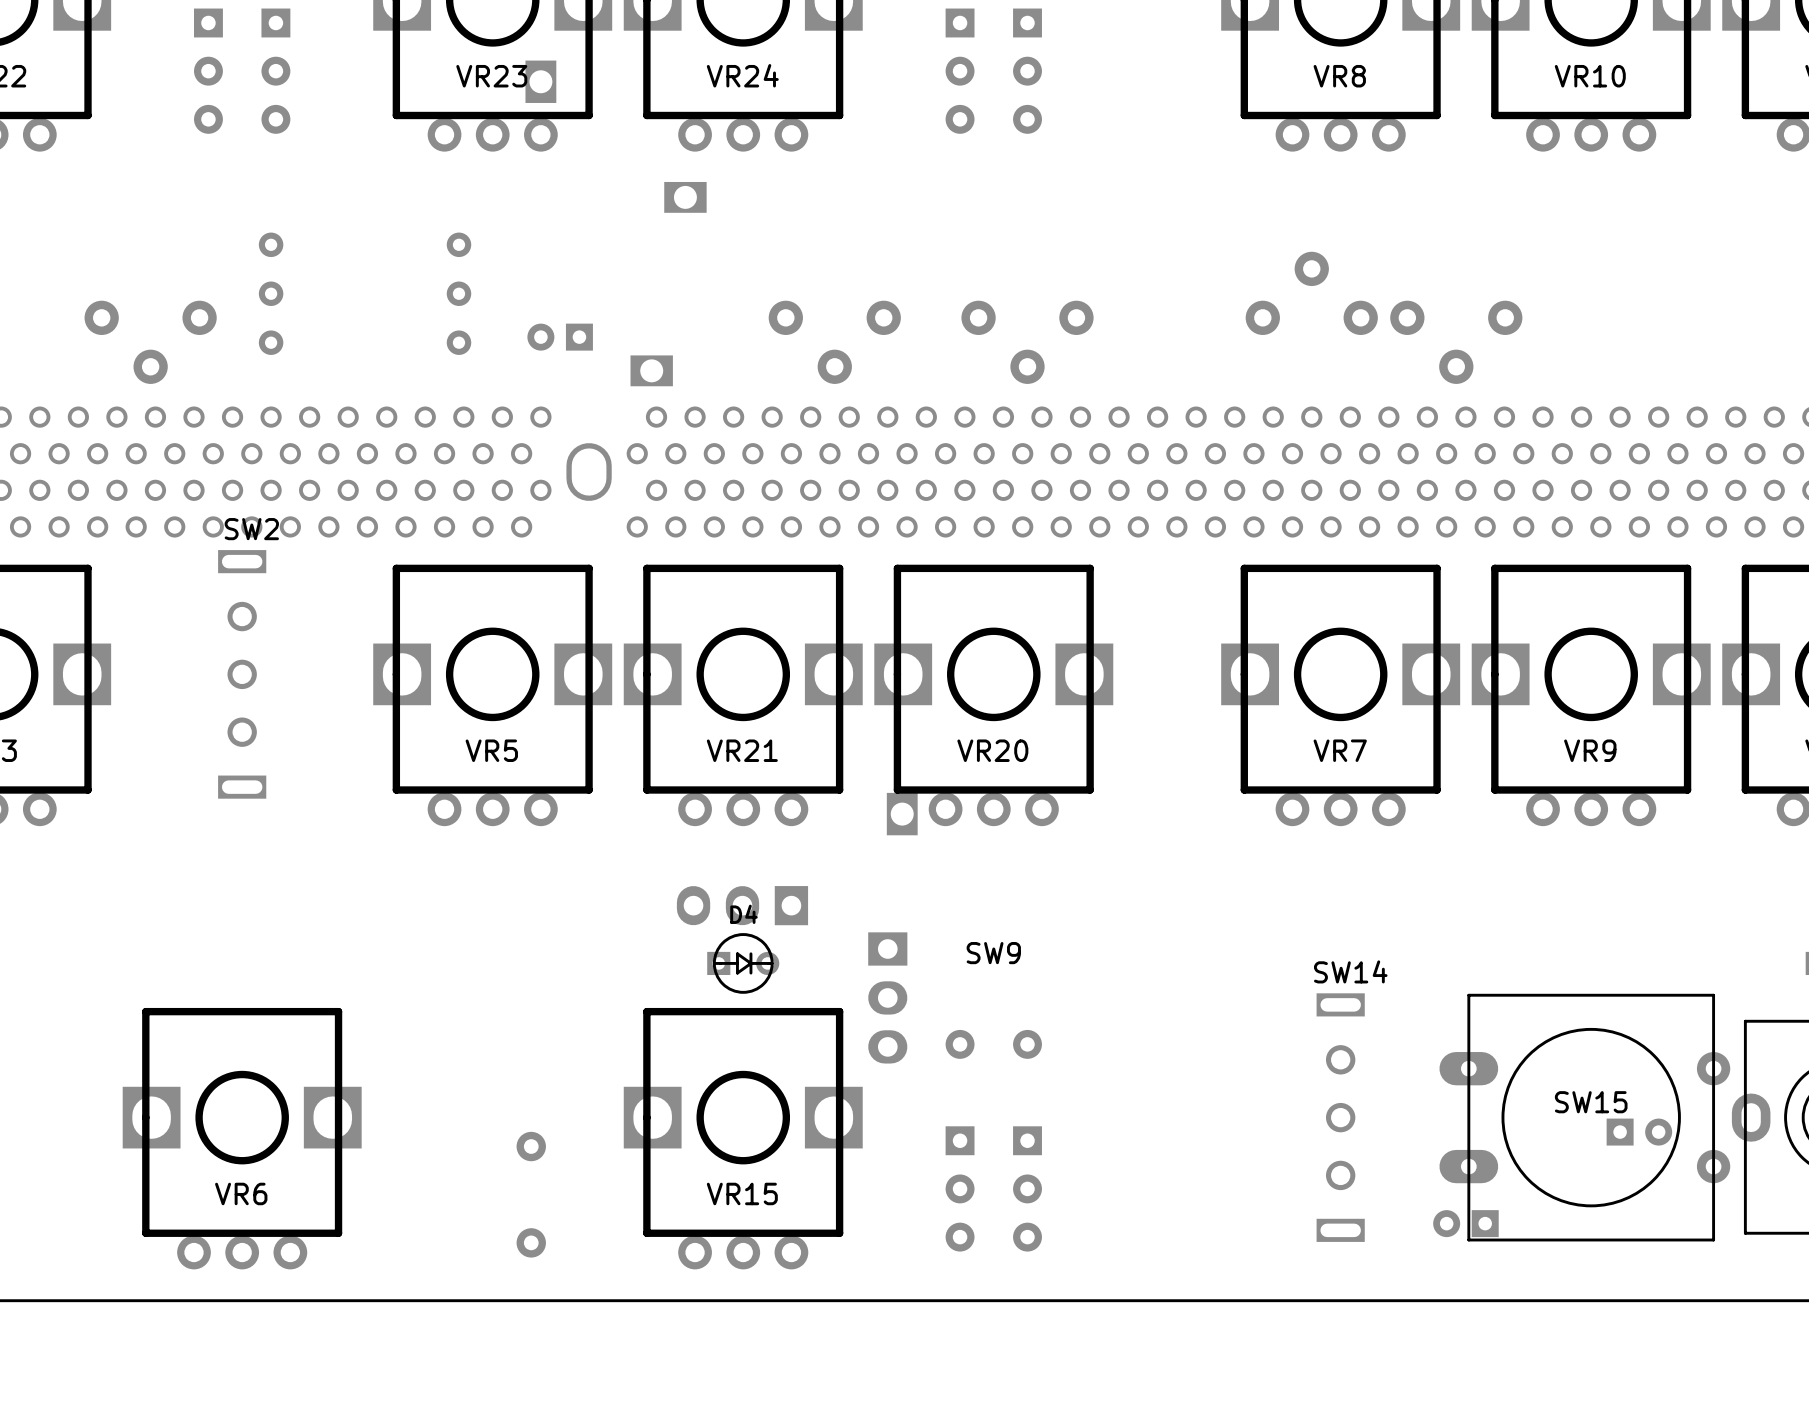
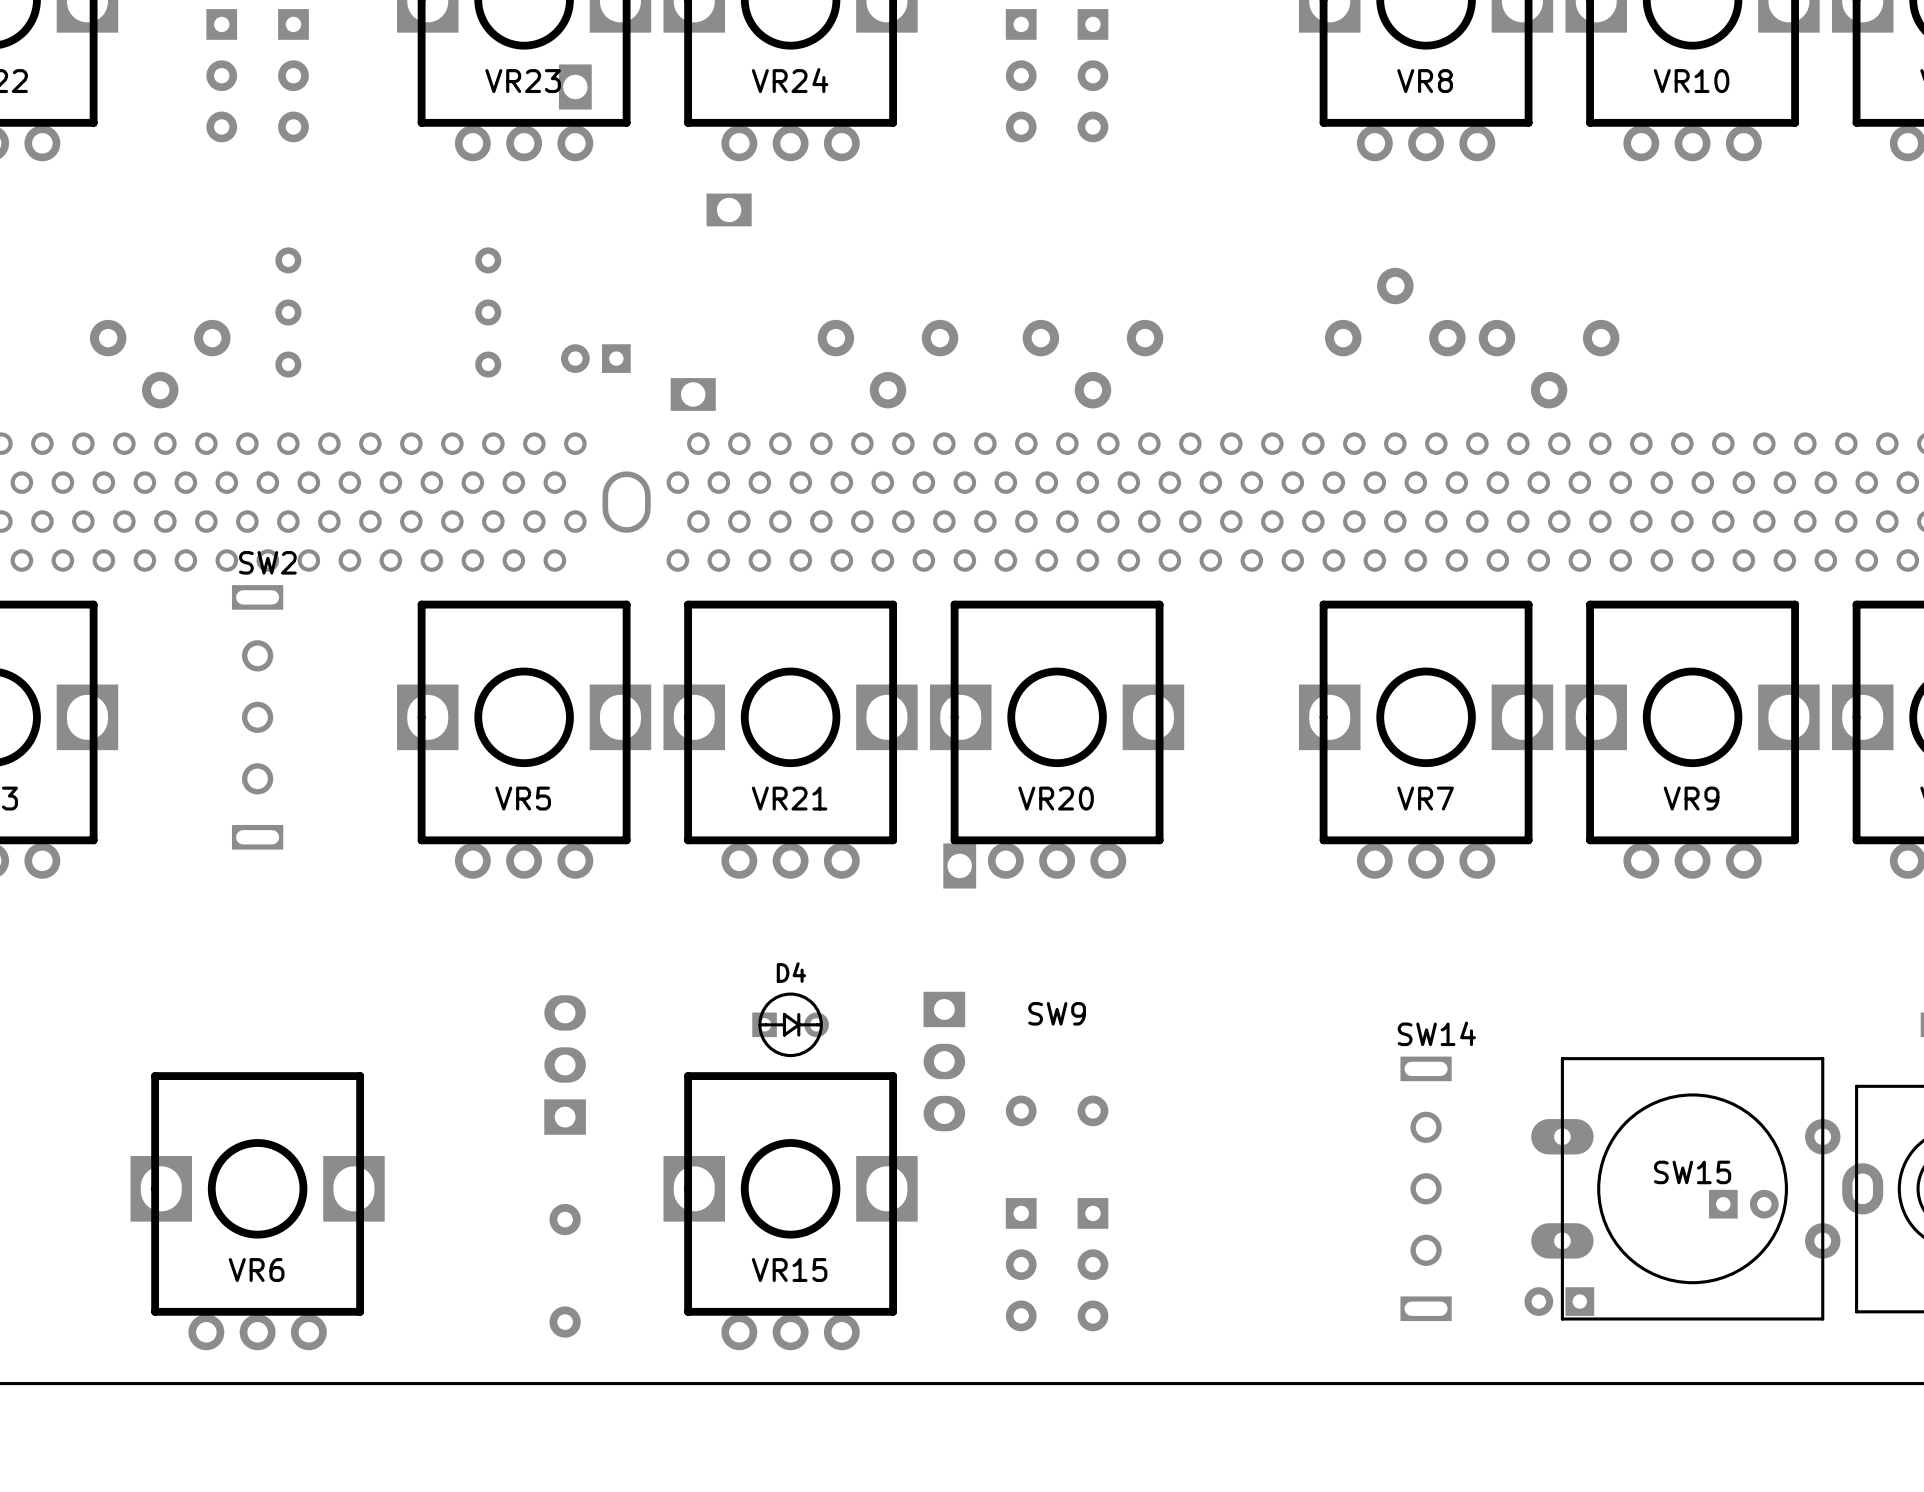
part rotation: 0° (742, 905) -> 90° clockwise (565, 1065)
part position: (742, 905) -> (565, 1065)

